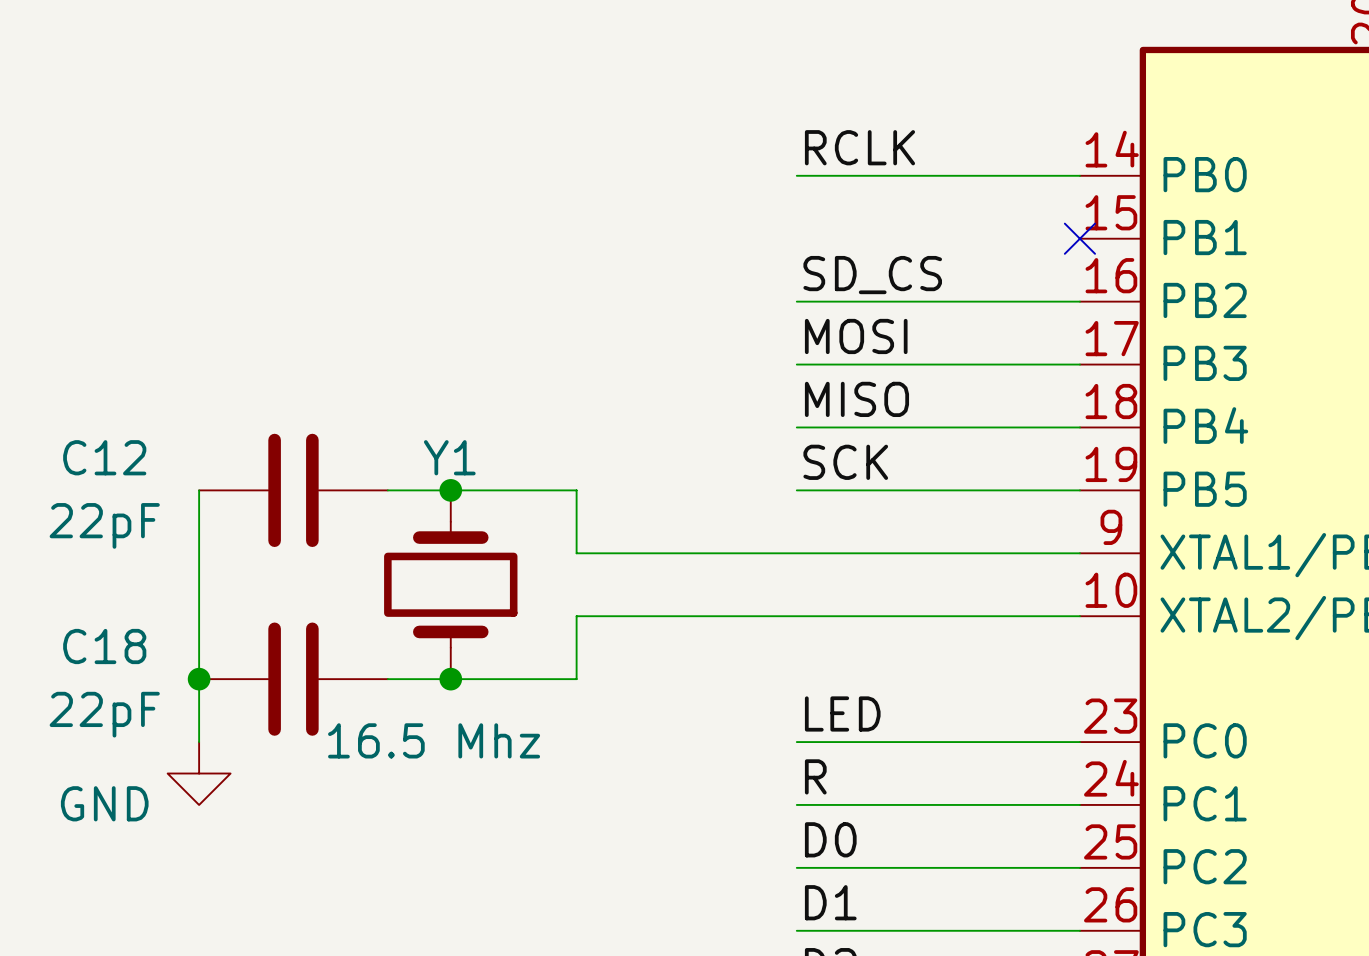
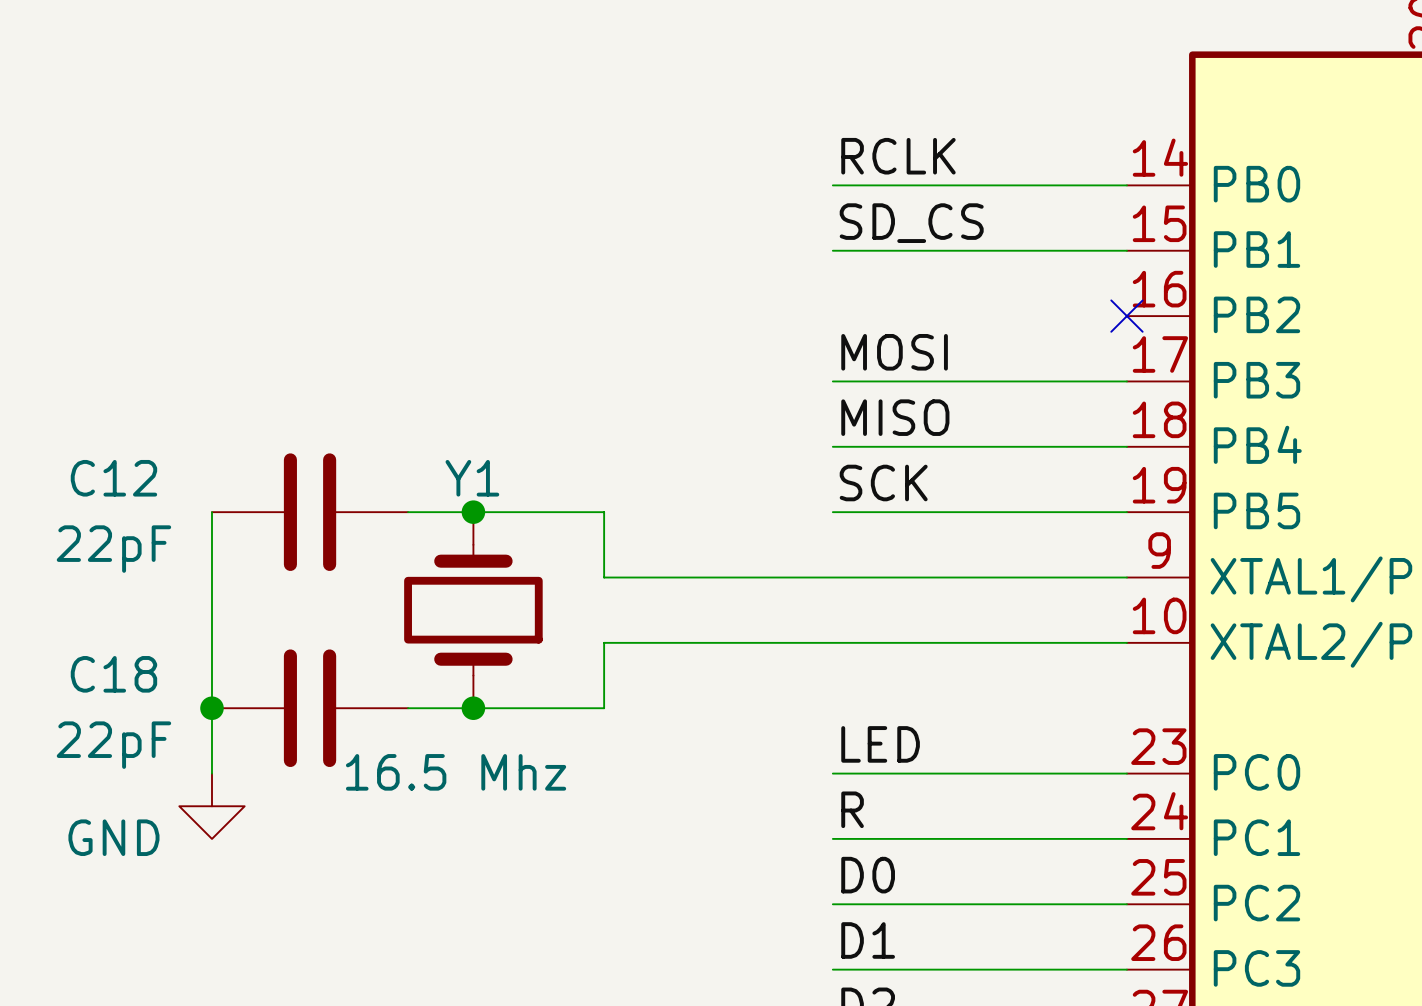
no-connect mark position: (1079, 238) -> (1126, 316)
label position: SD_CS (872, 275) -> SD_CS (911, 223)
wire: (796, 301) (1079, 301) -> (832, 250) (1126, 250)

